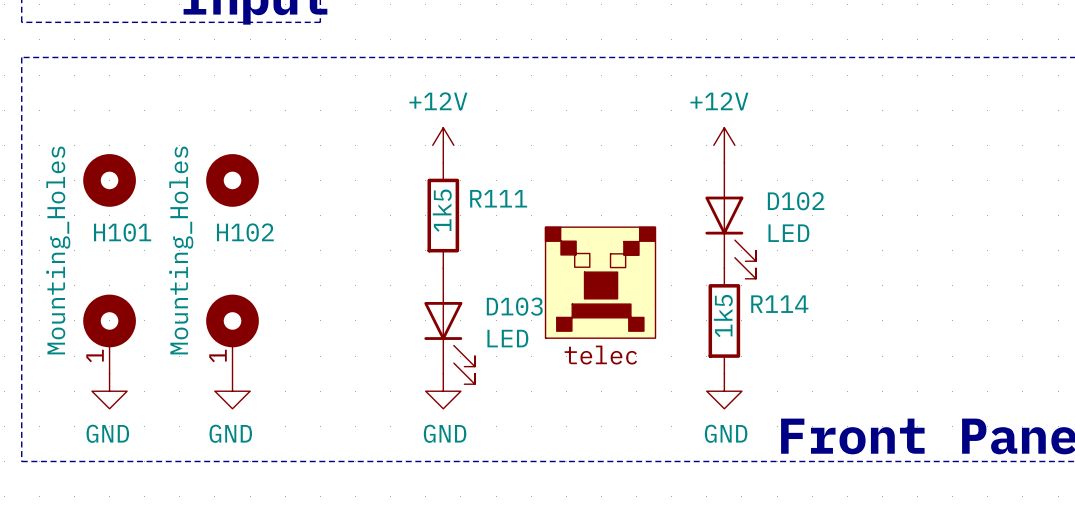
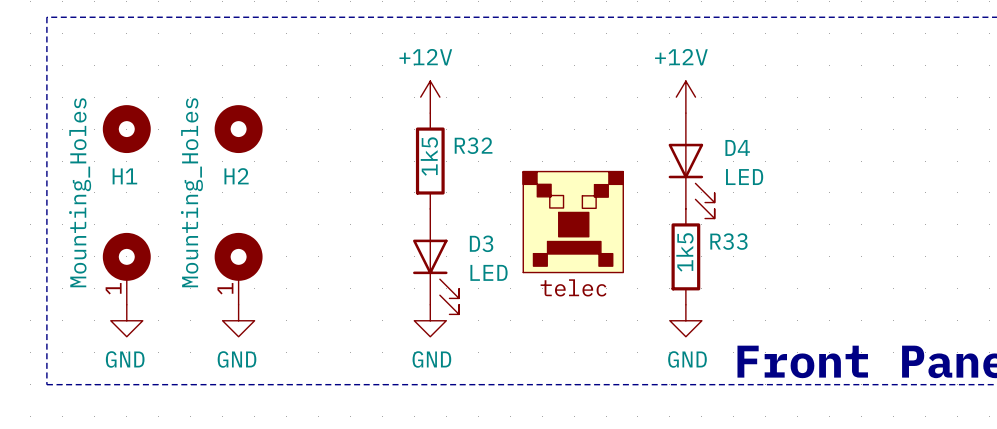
R111 name: R111 (498, 198) -> R32 (473, 145)
D102 name: D102 (796, 201) -> D4 (737, 147)
H101 name: H101 (122, 232) -> H1 (124, 176)
H102 name: H102 (245, 232) -> H2 (236, 176)
R114 name: R114 (779, 304) -> R33 (728, 241)
D103 name: D103 (514, 306) -> D3 (481, 243)

